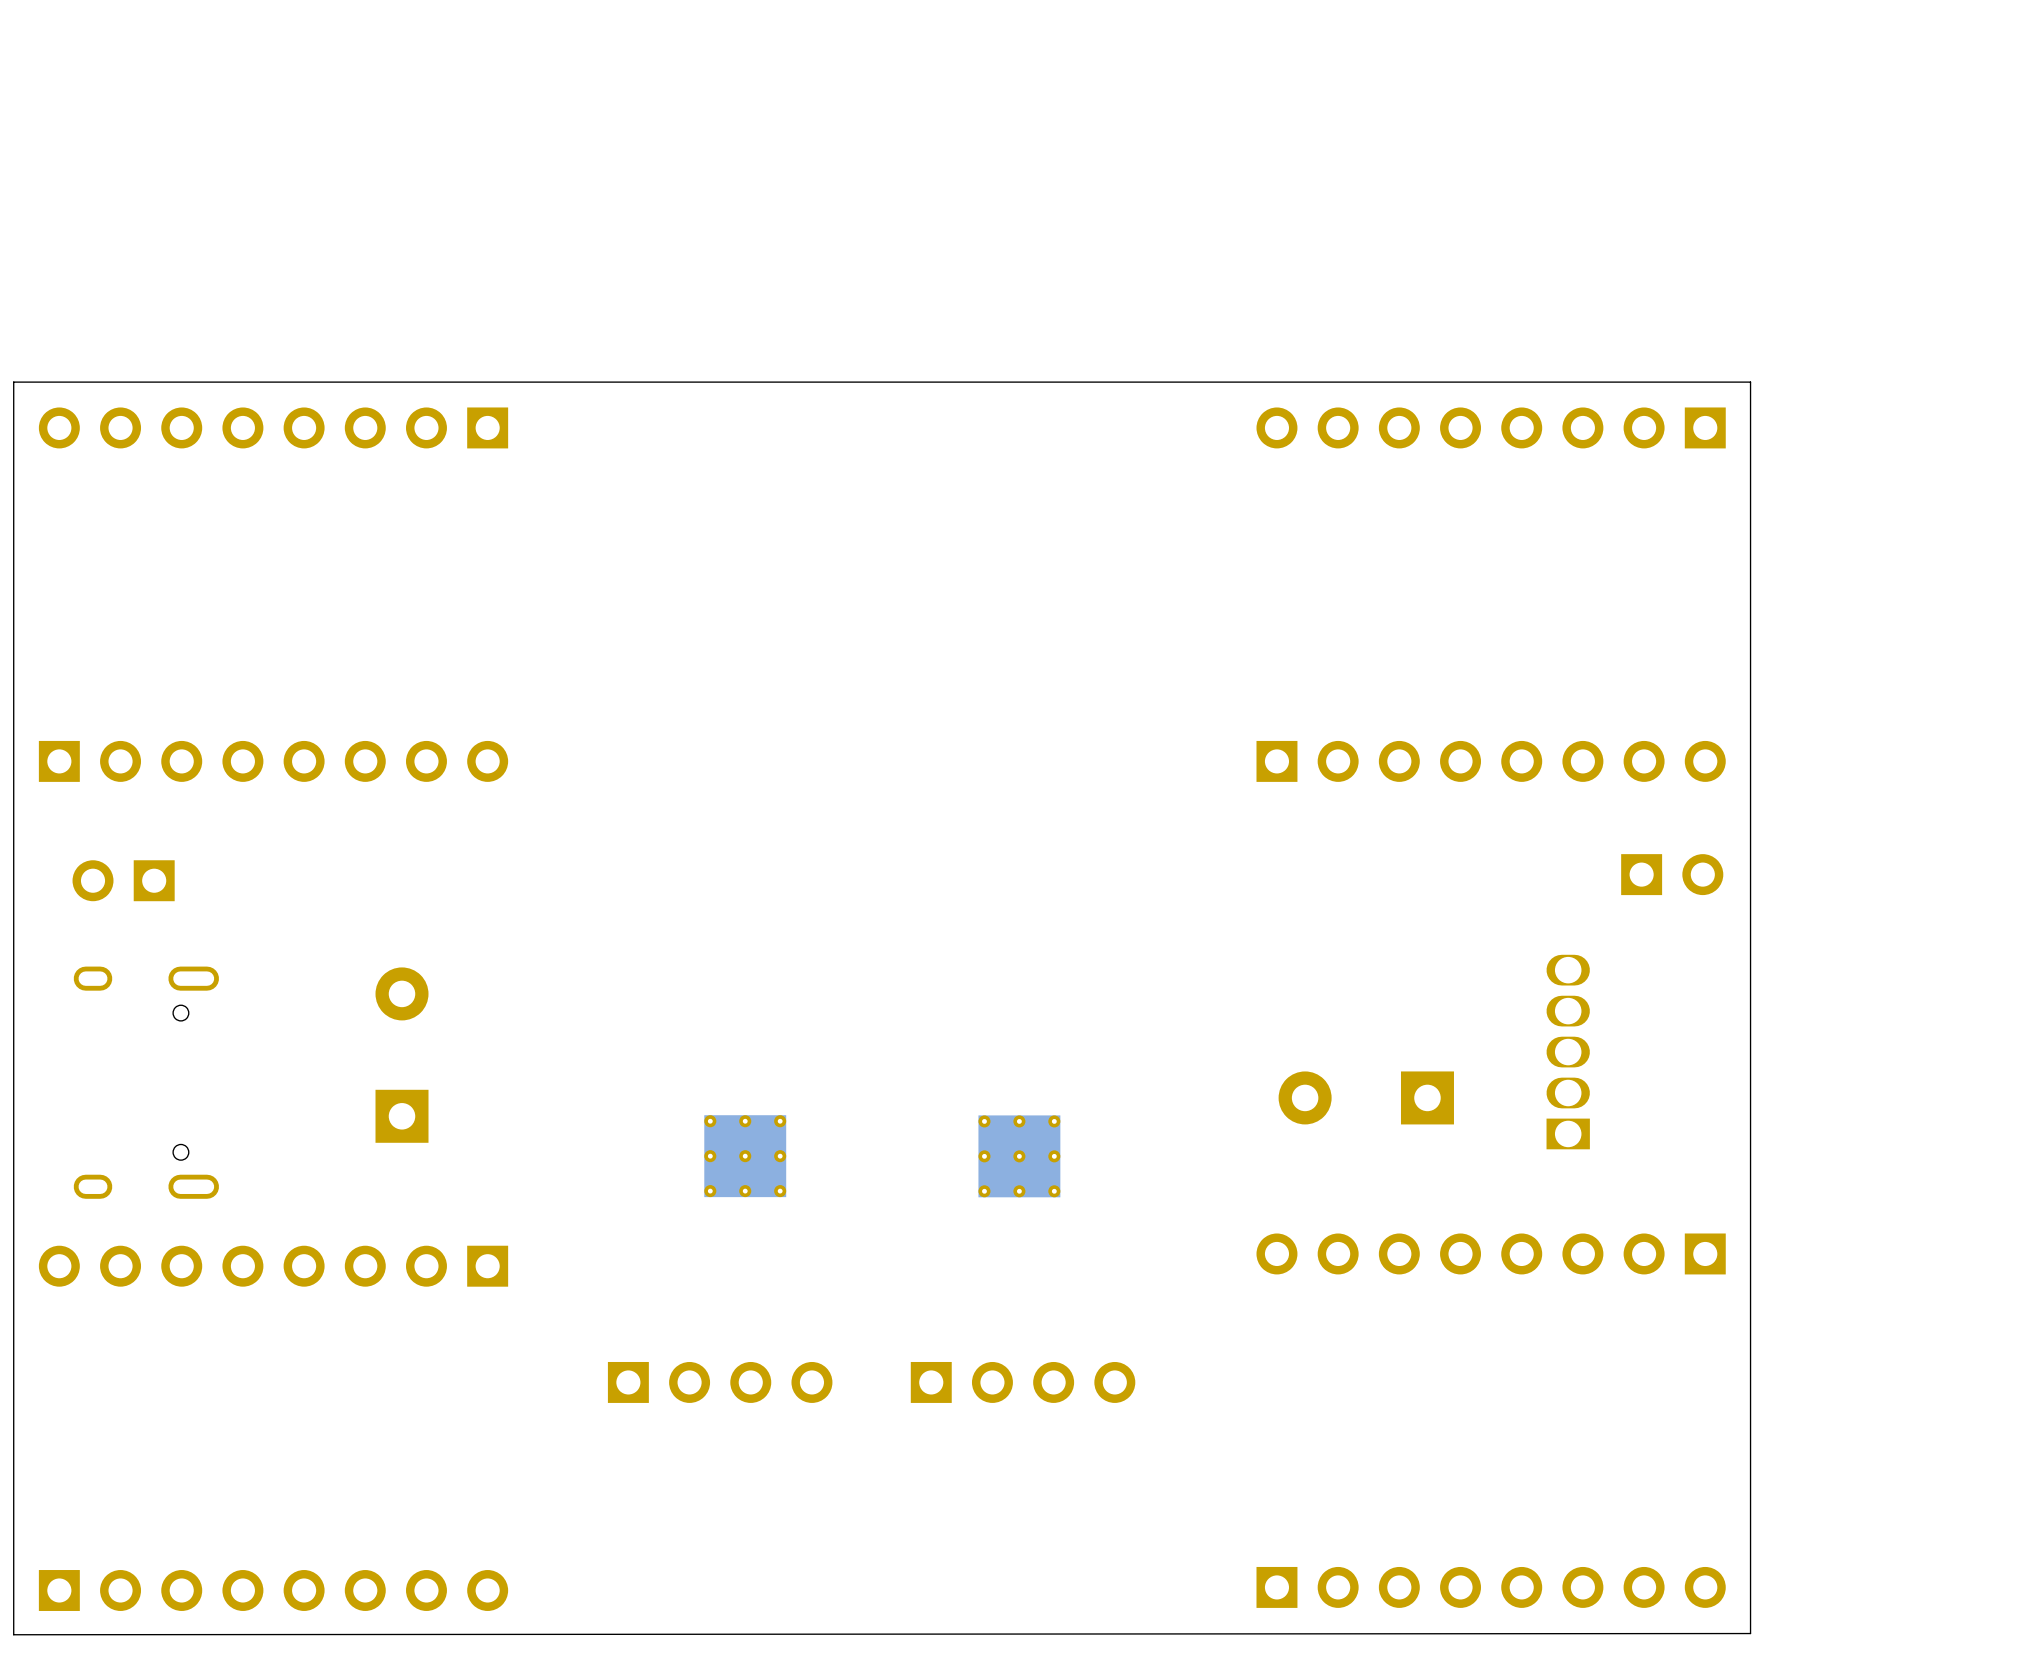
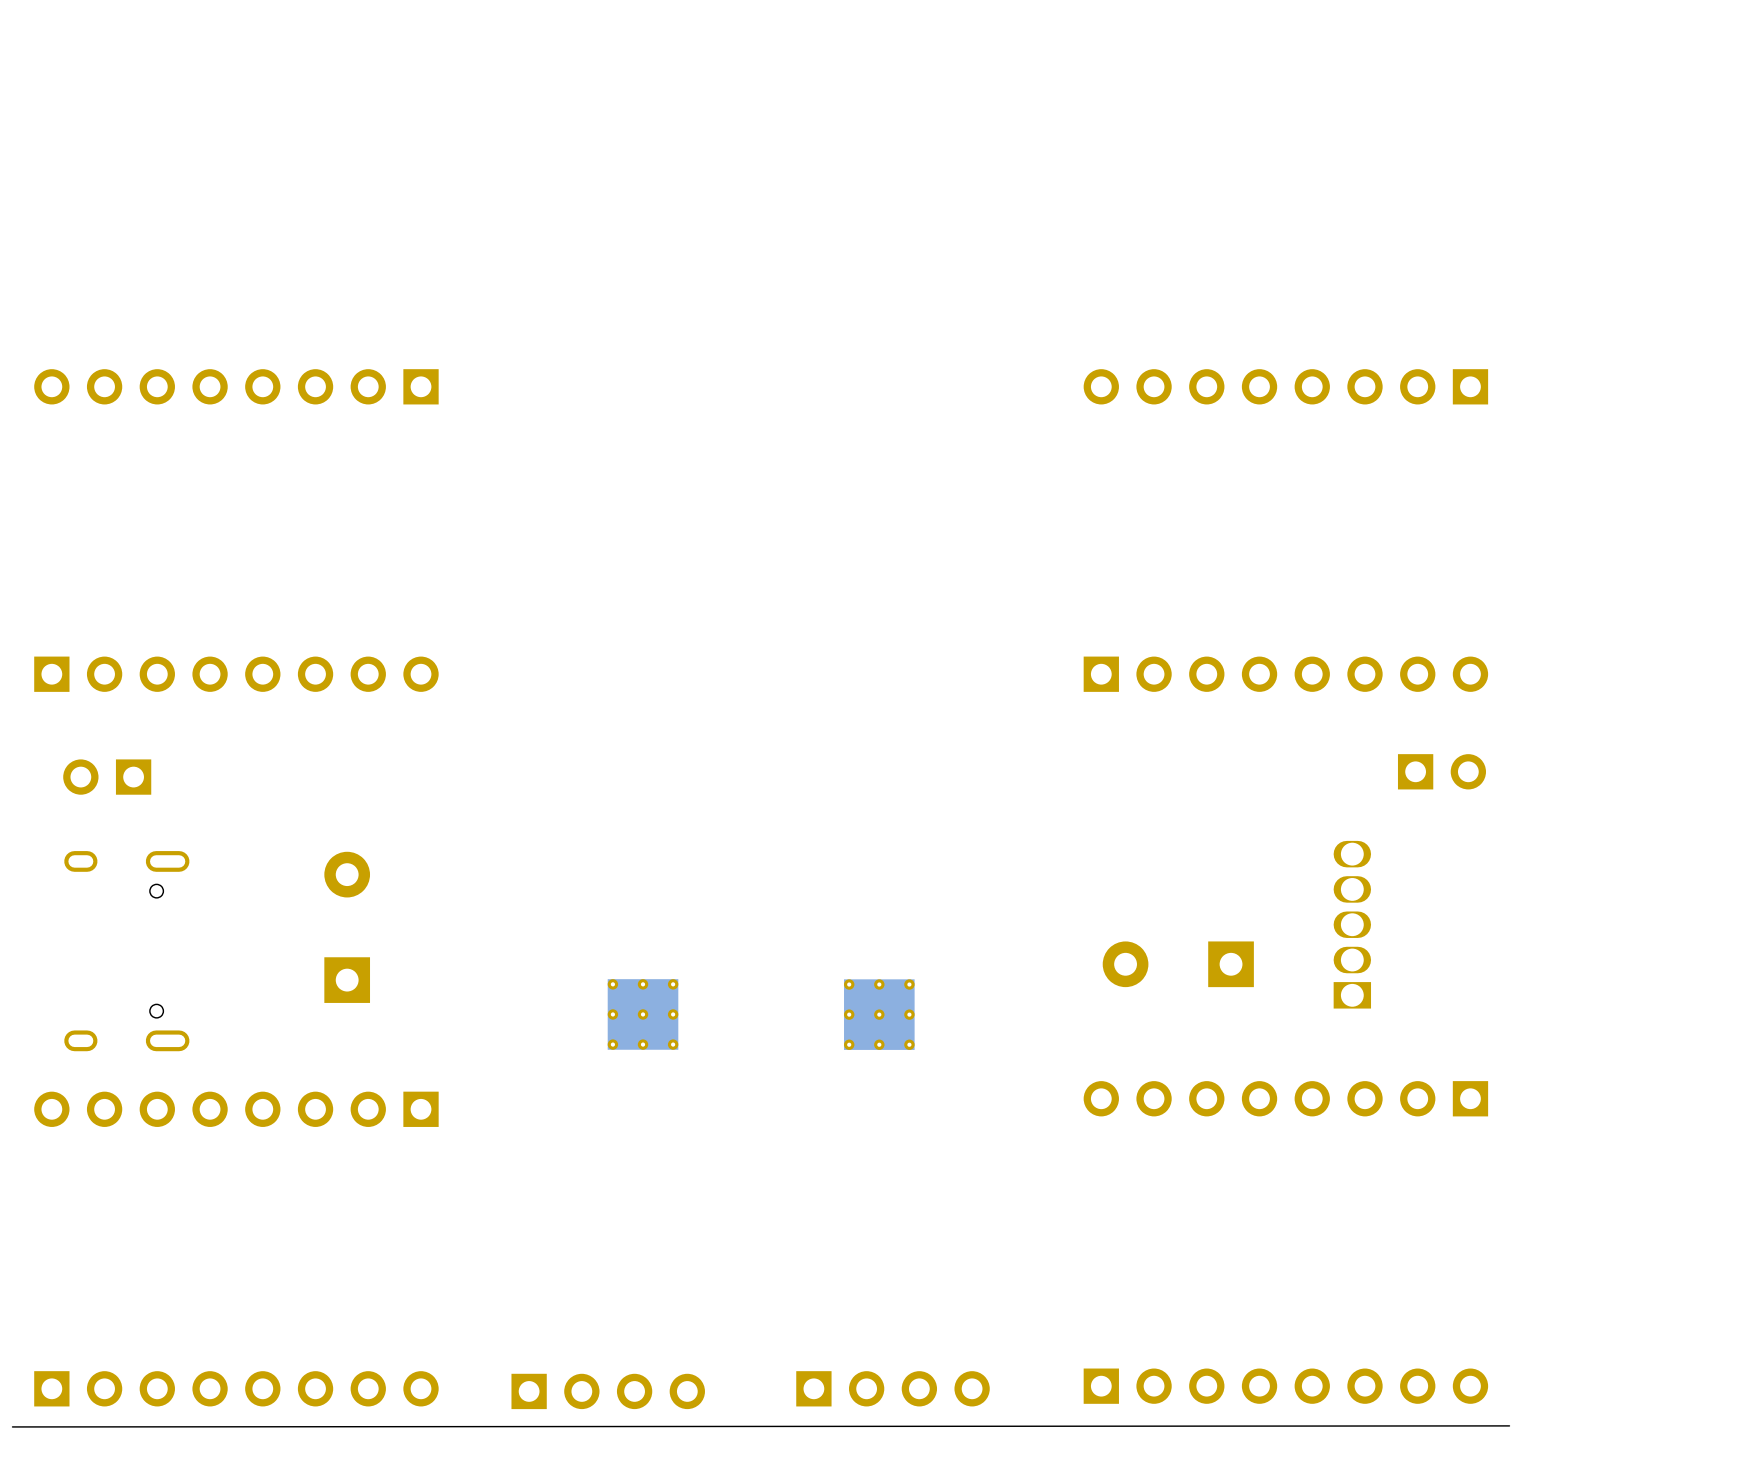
part: (720, 1382) -> none
part: (1023, 1382) -> none
part: none -> (893, 1388)
part: none -> (608, 1391)
board edge: (1750, 1633) (1750, 382) (13, 382) (13, 1634) -> none

